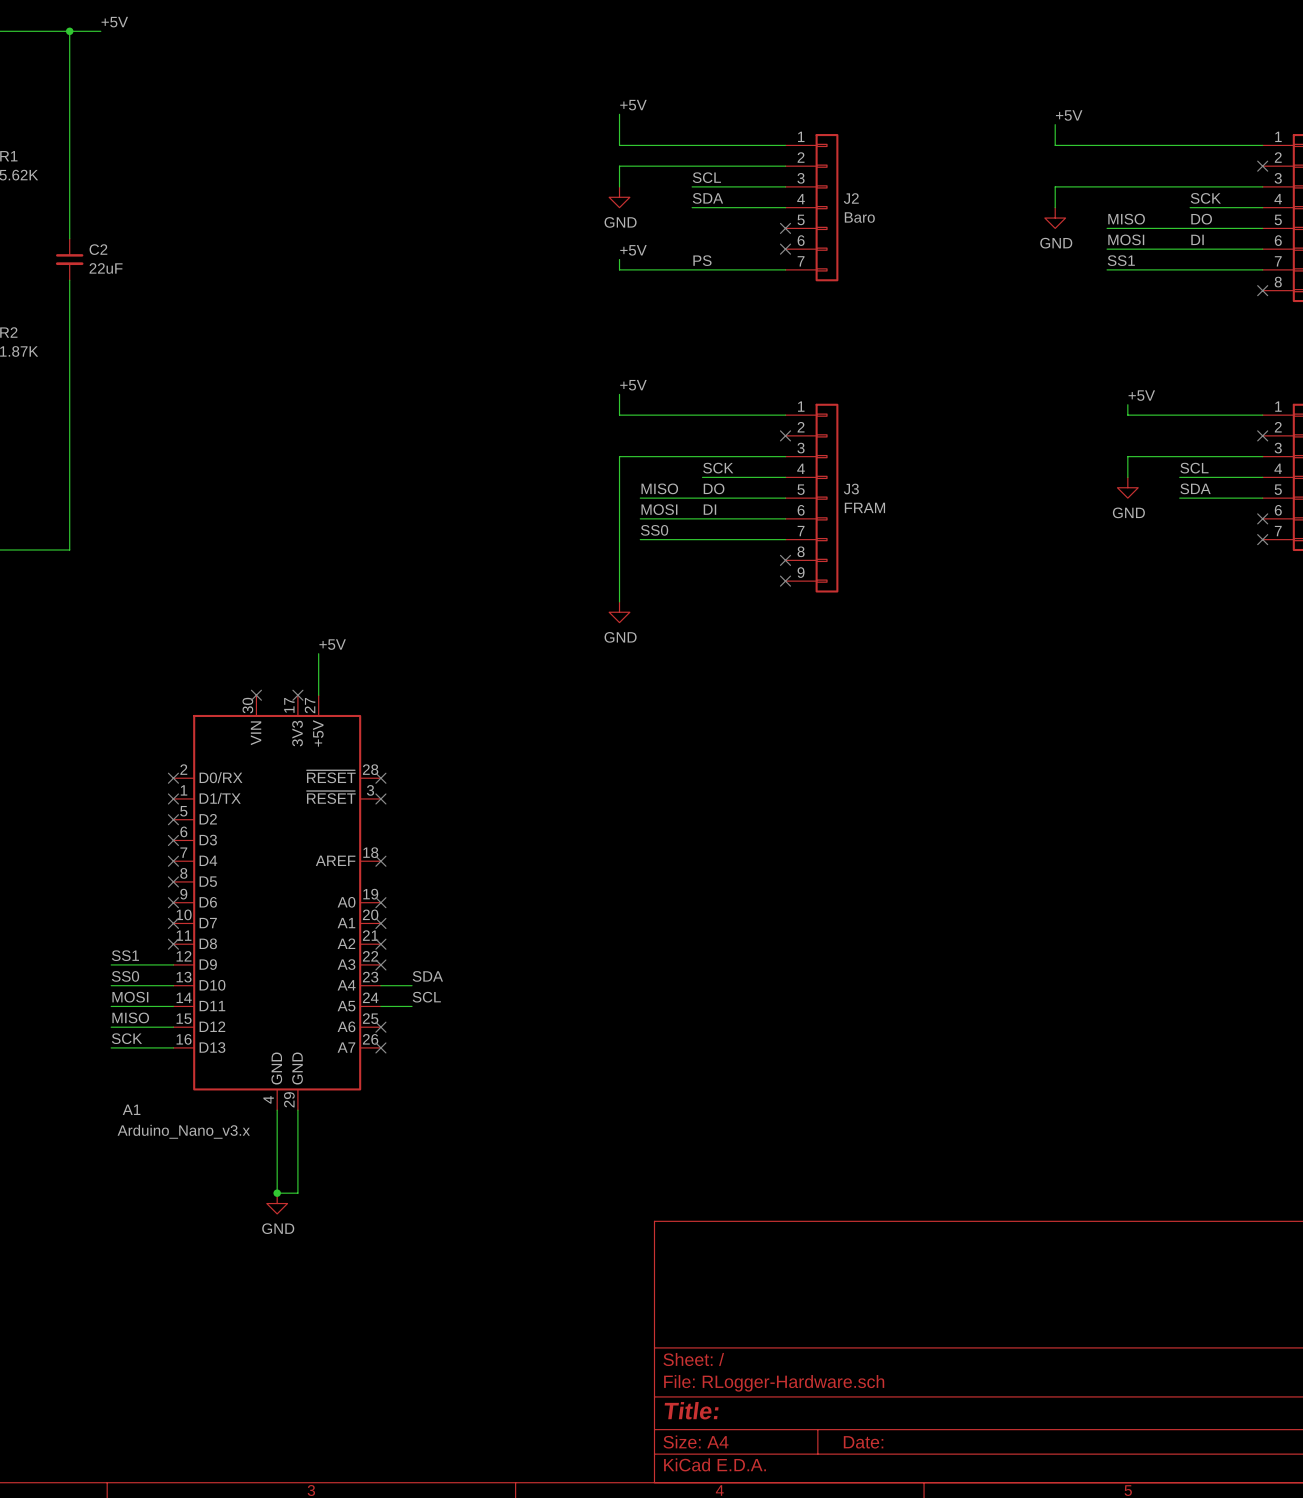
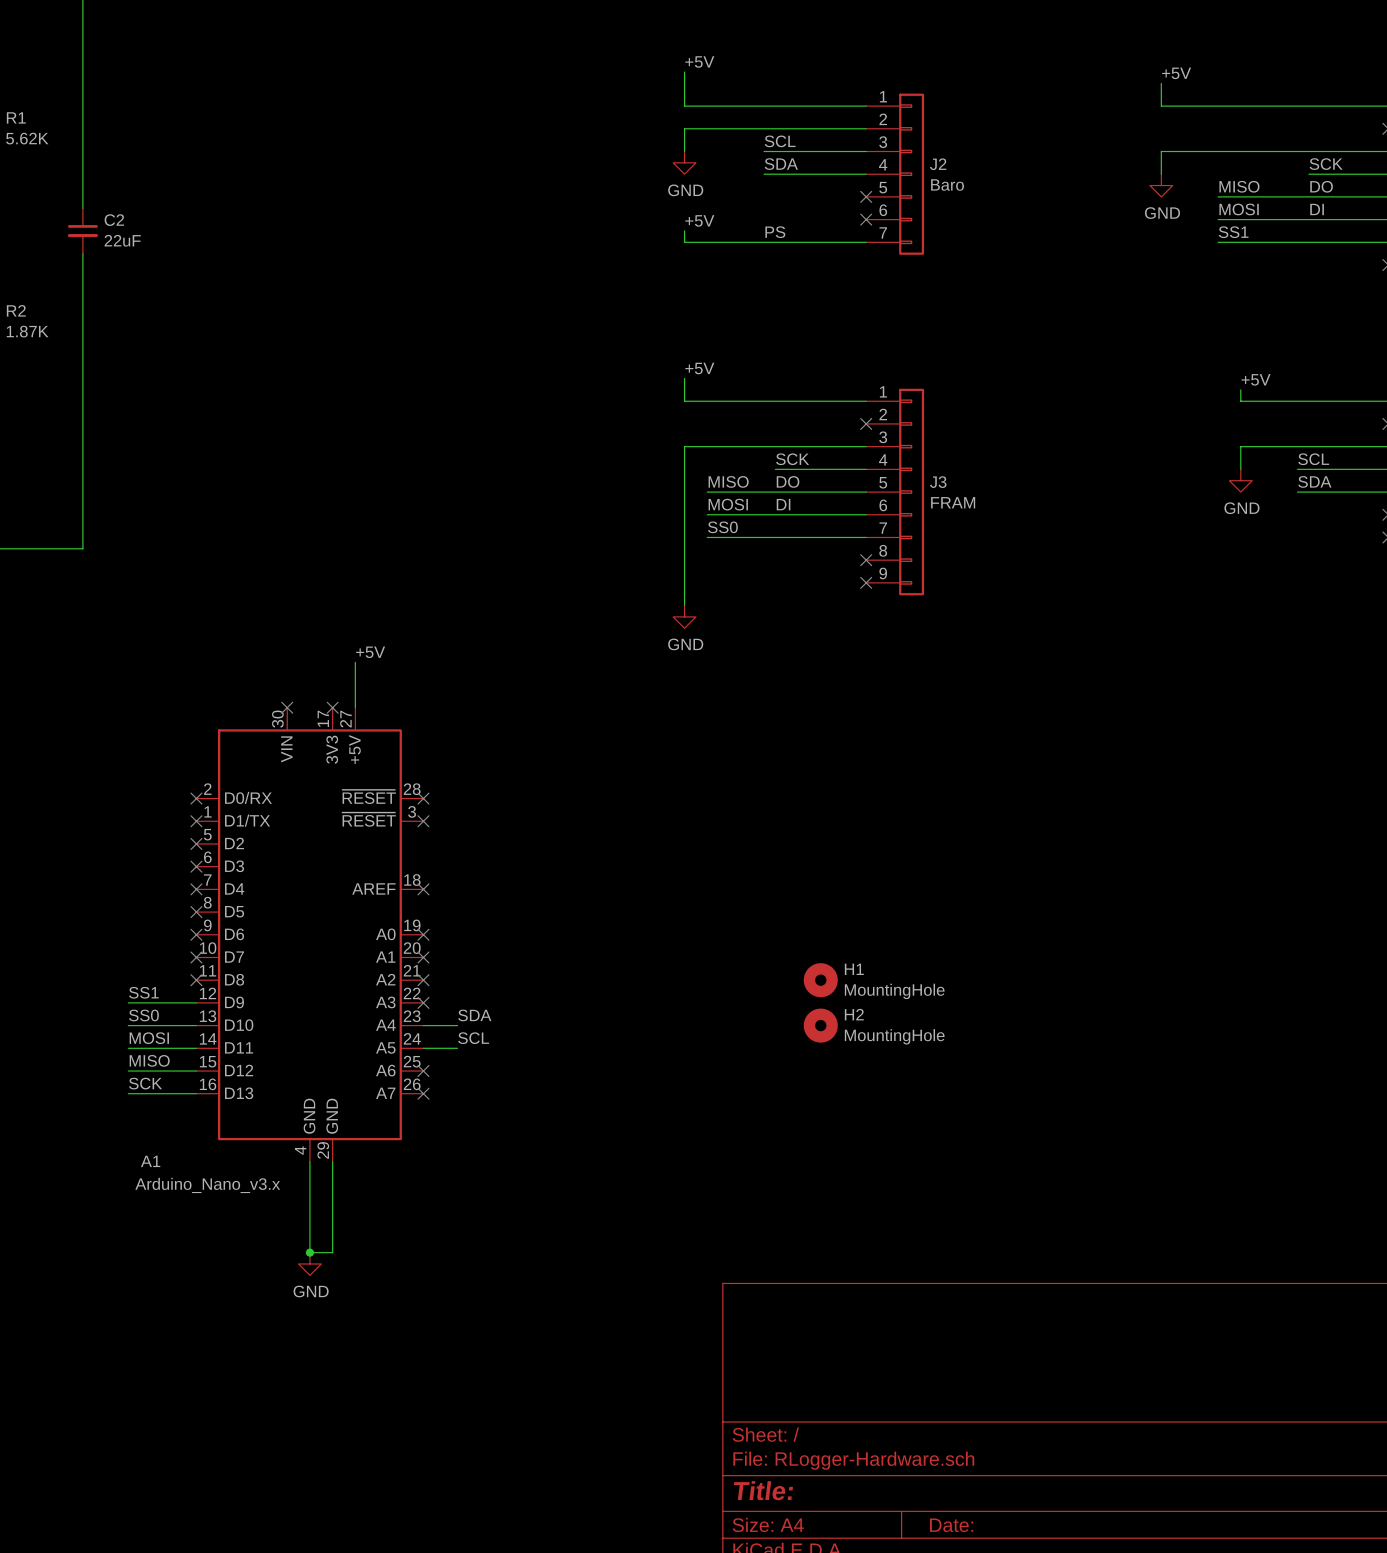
H1: none -> MountingHole (820, 980)
H2: none -> MountingHole (820, 1025)

